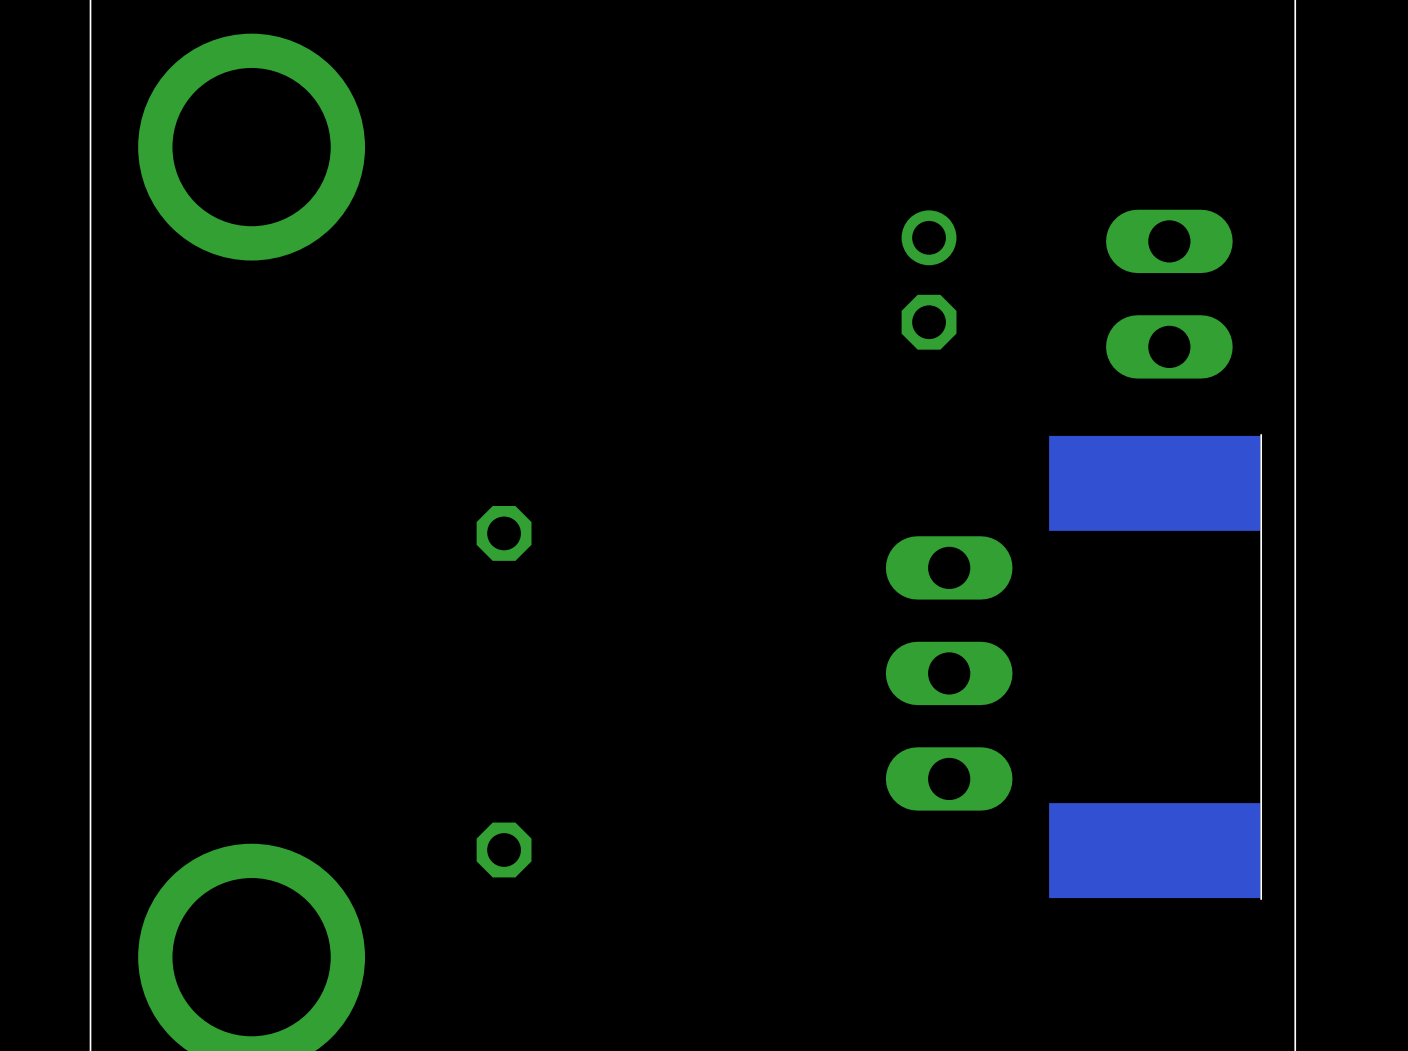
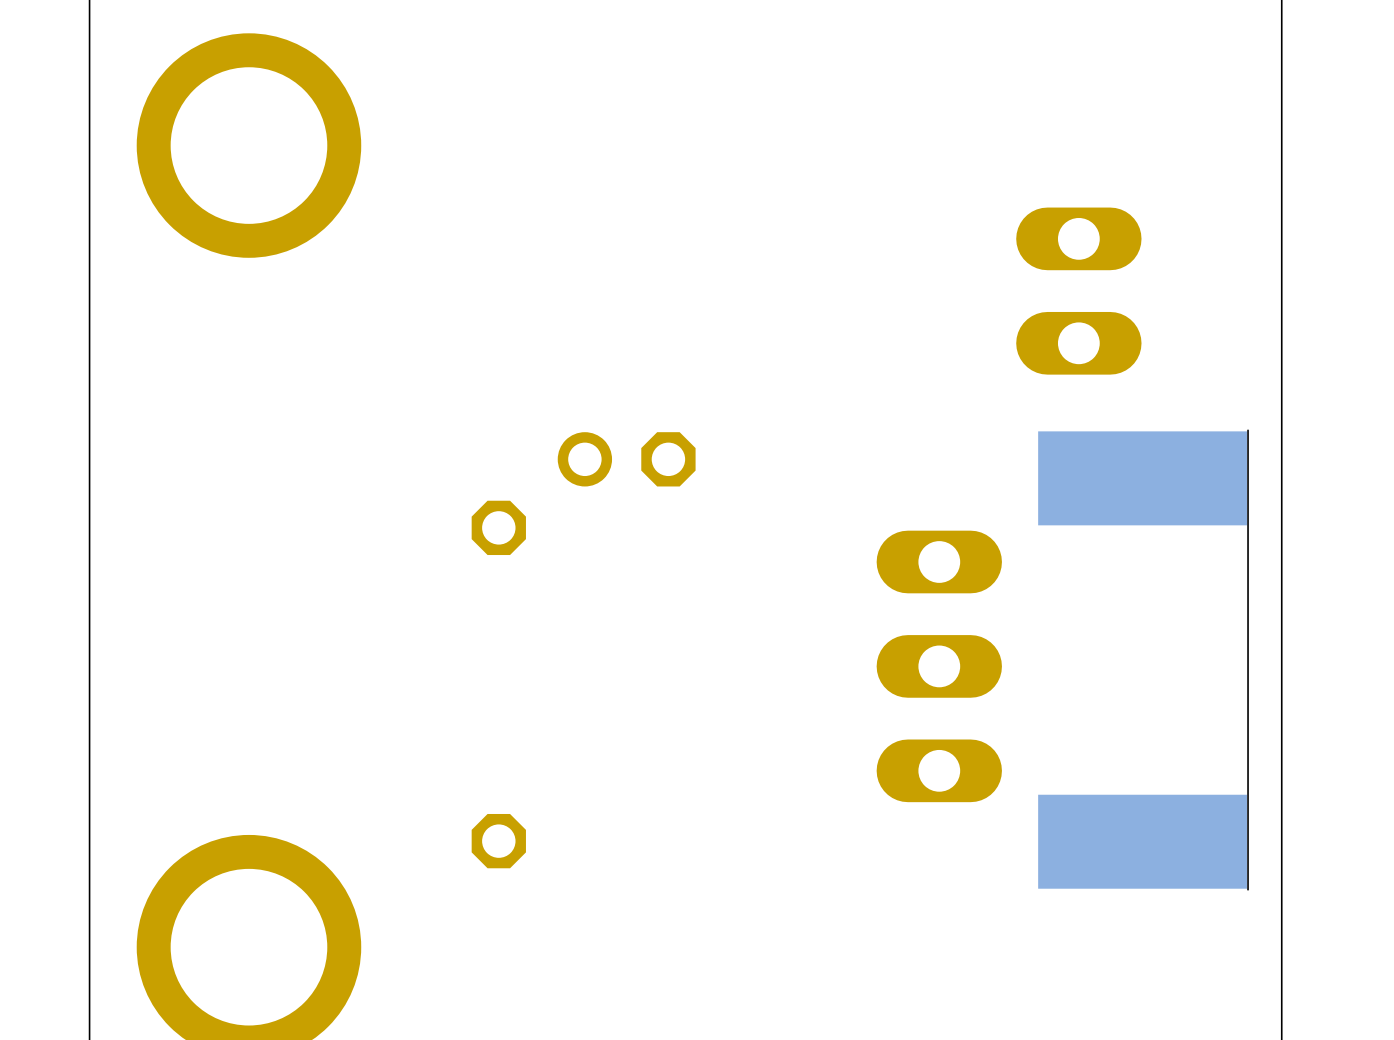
part rotation: 0° (929, 280) -> 90° counterclockwise (626, 459)
part position: (929, 280) -> (626, 459)
part position: (1169, 294) -> (1078, 291)

